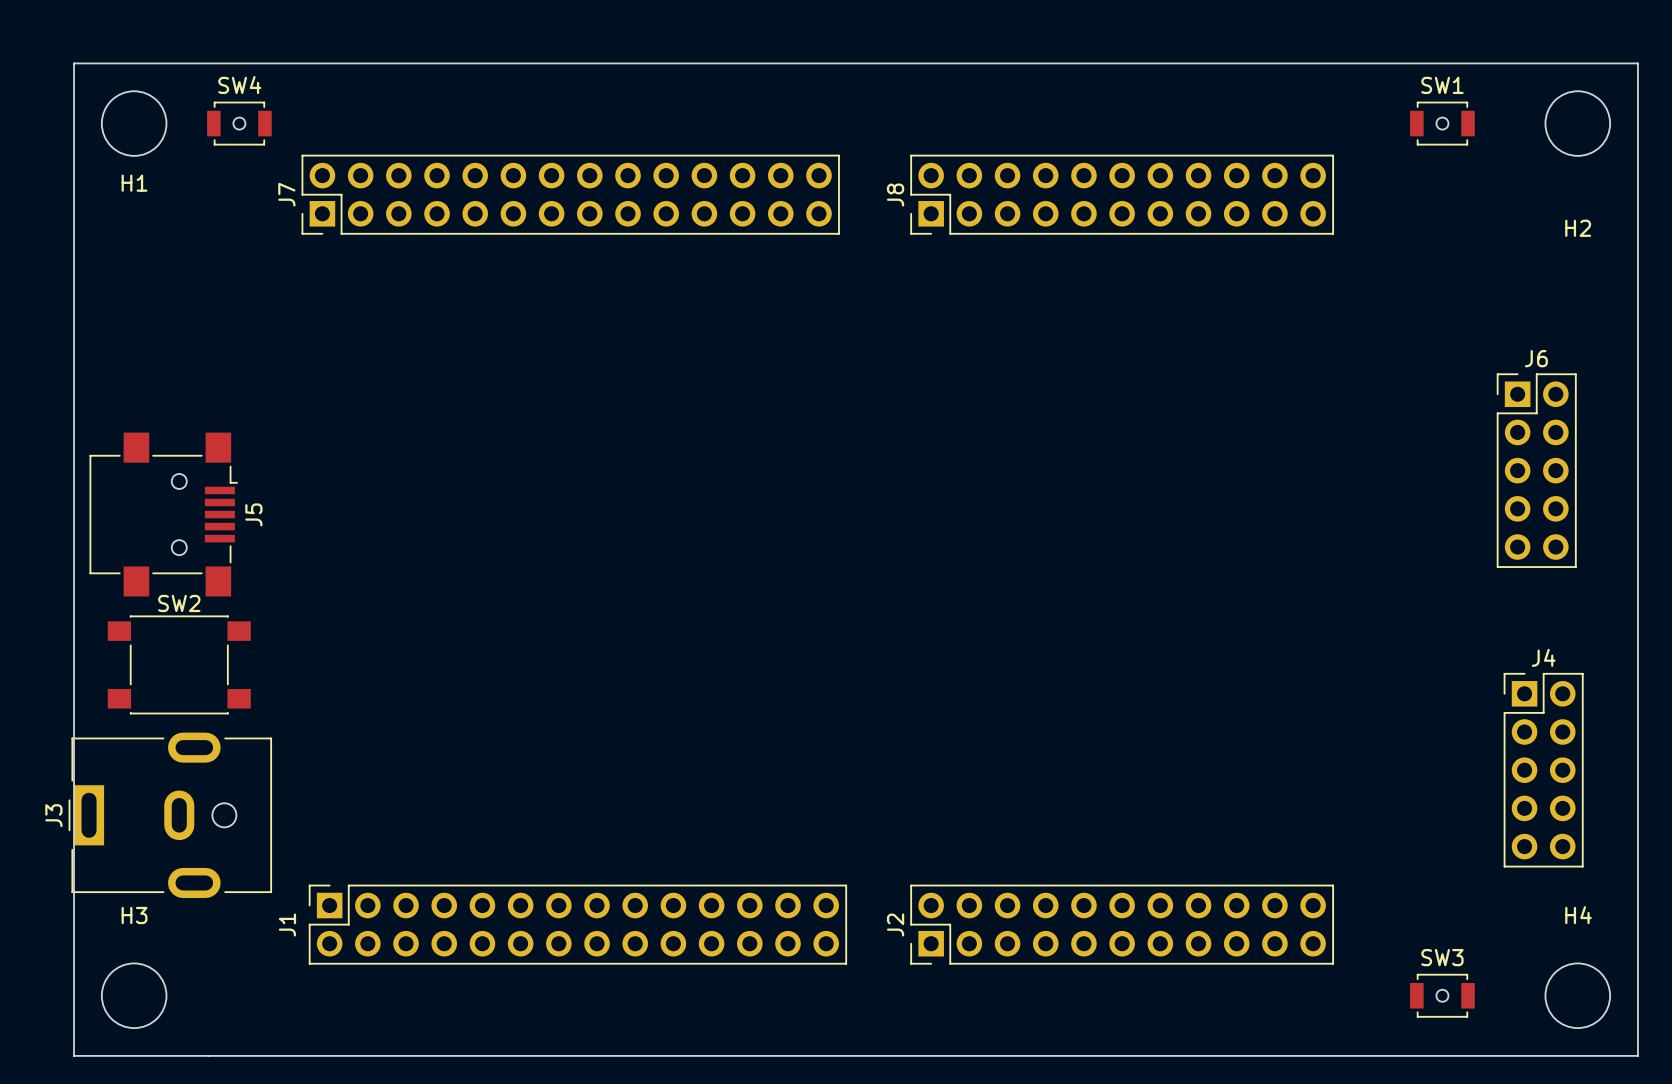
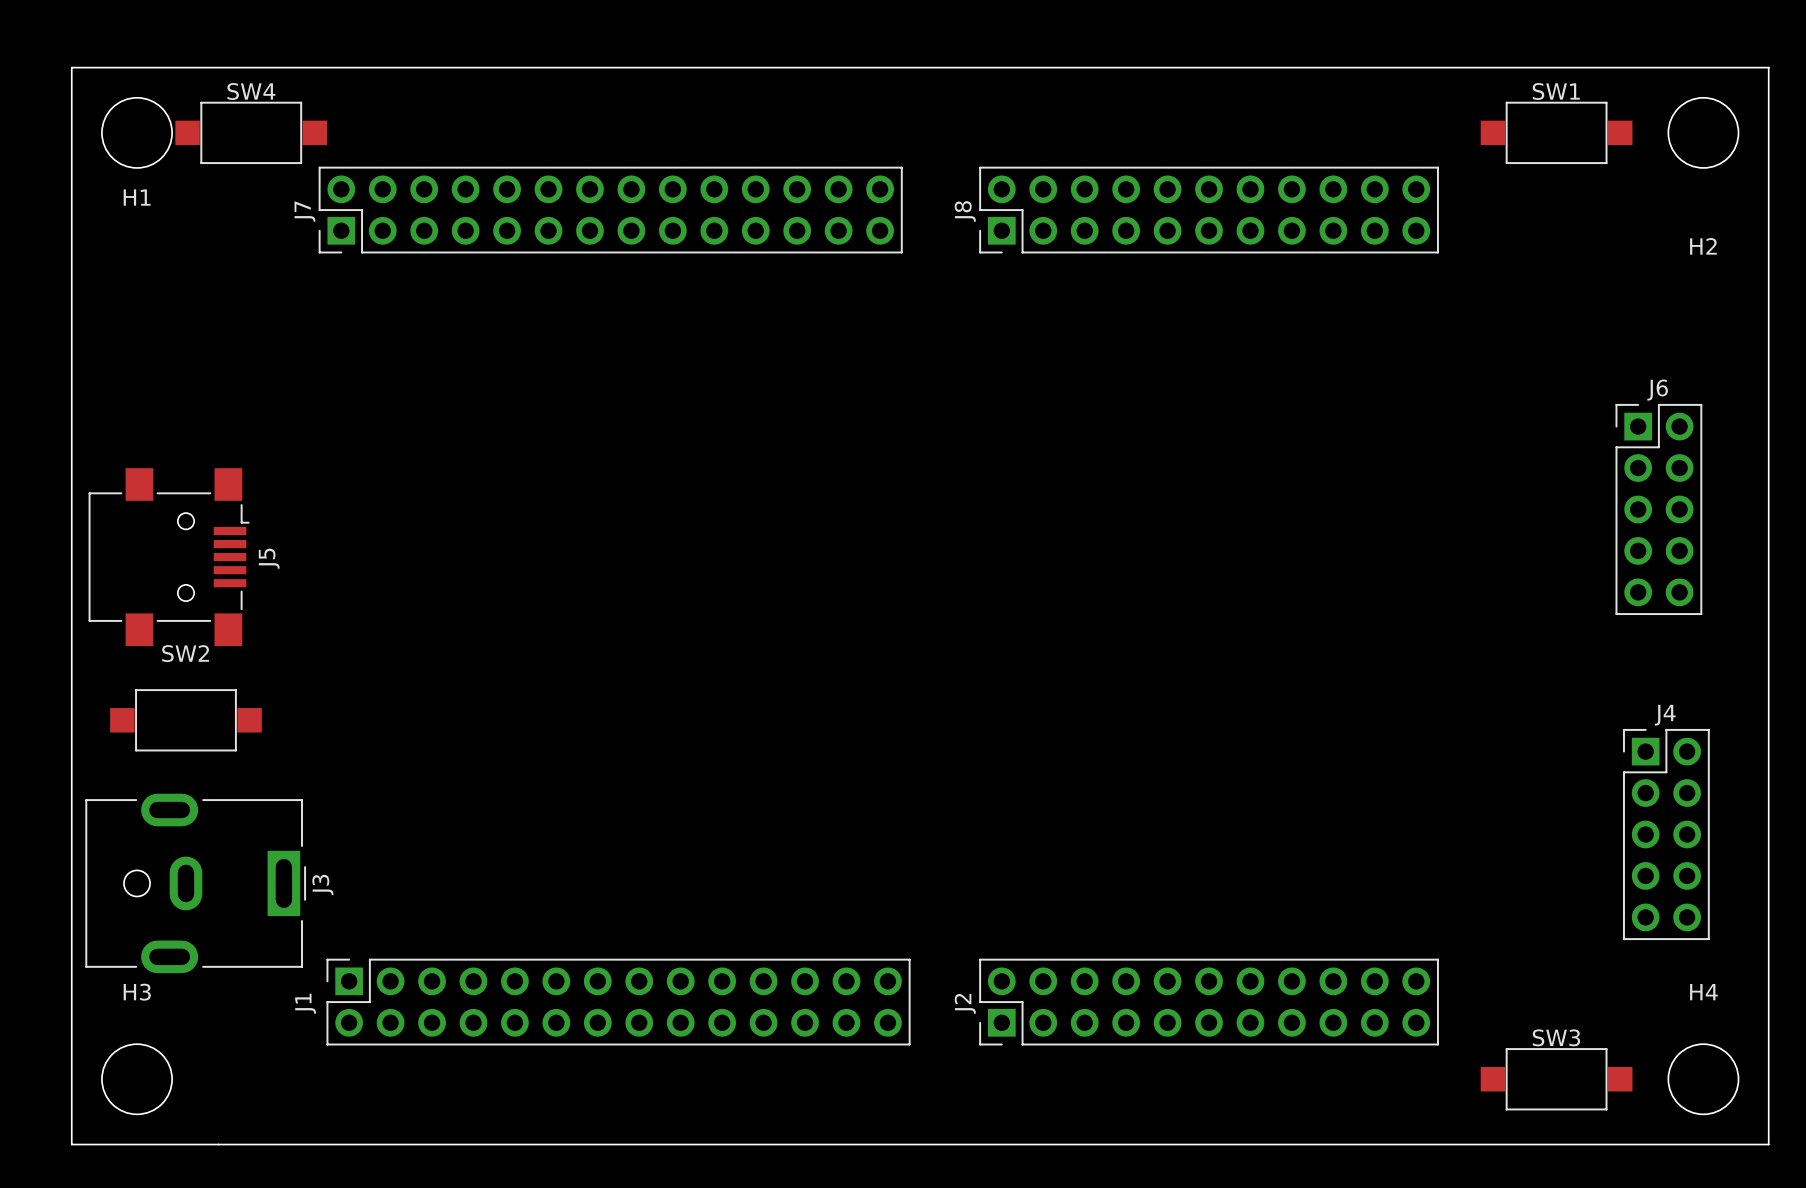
SW4 footprint: [207, 101, 272, 146] -> [175, 101, 328, 165]
SW1 footprint: [1410, 101, 1475, 146] -> [1480, 101, 1633, 165]
SW2 footprint: [107, 615, 251, 715] -> [110, 689, 262, 752]
J3 rotation: 0° (170, 815) -> 180° (195, 883)
SW3 footprint: [1410, 973, 1475, 1018] -> [1480, 1048, 1633, 1111]

